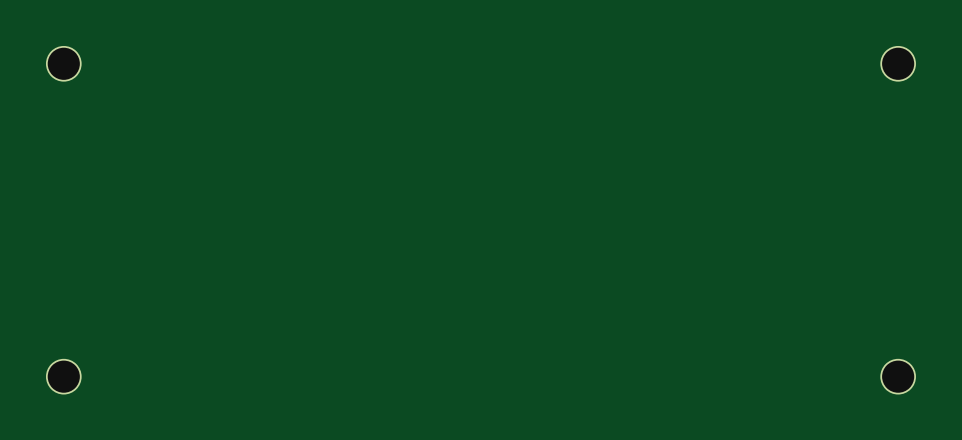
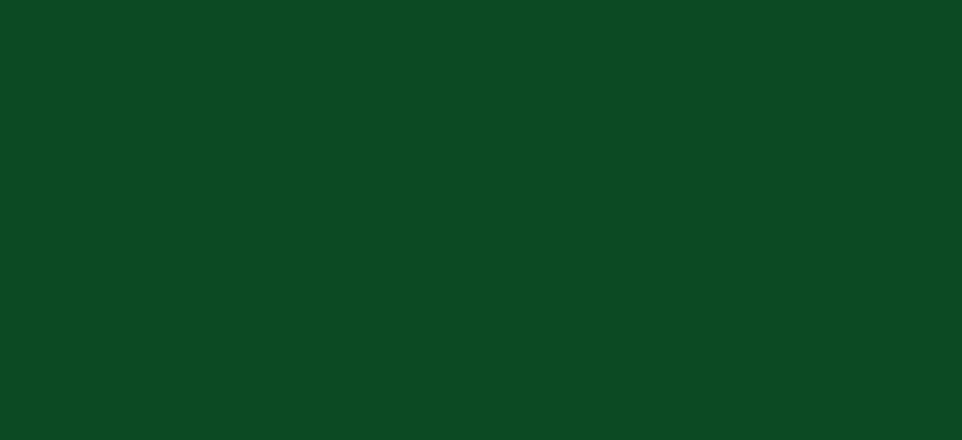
hole: (63, 63) -> none
hole: (898, 63) -> none
hole: (63, 376) -> none
hole: (898, 376) -> none

